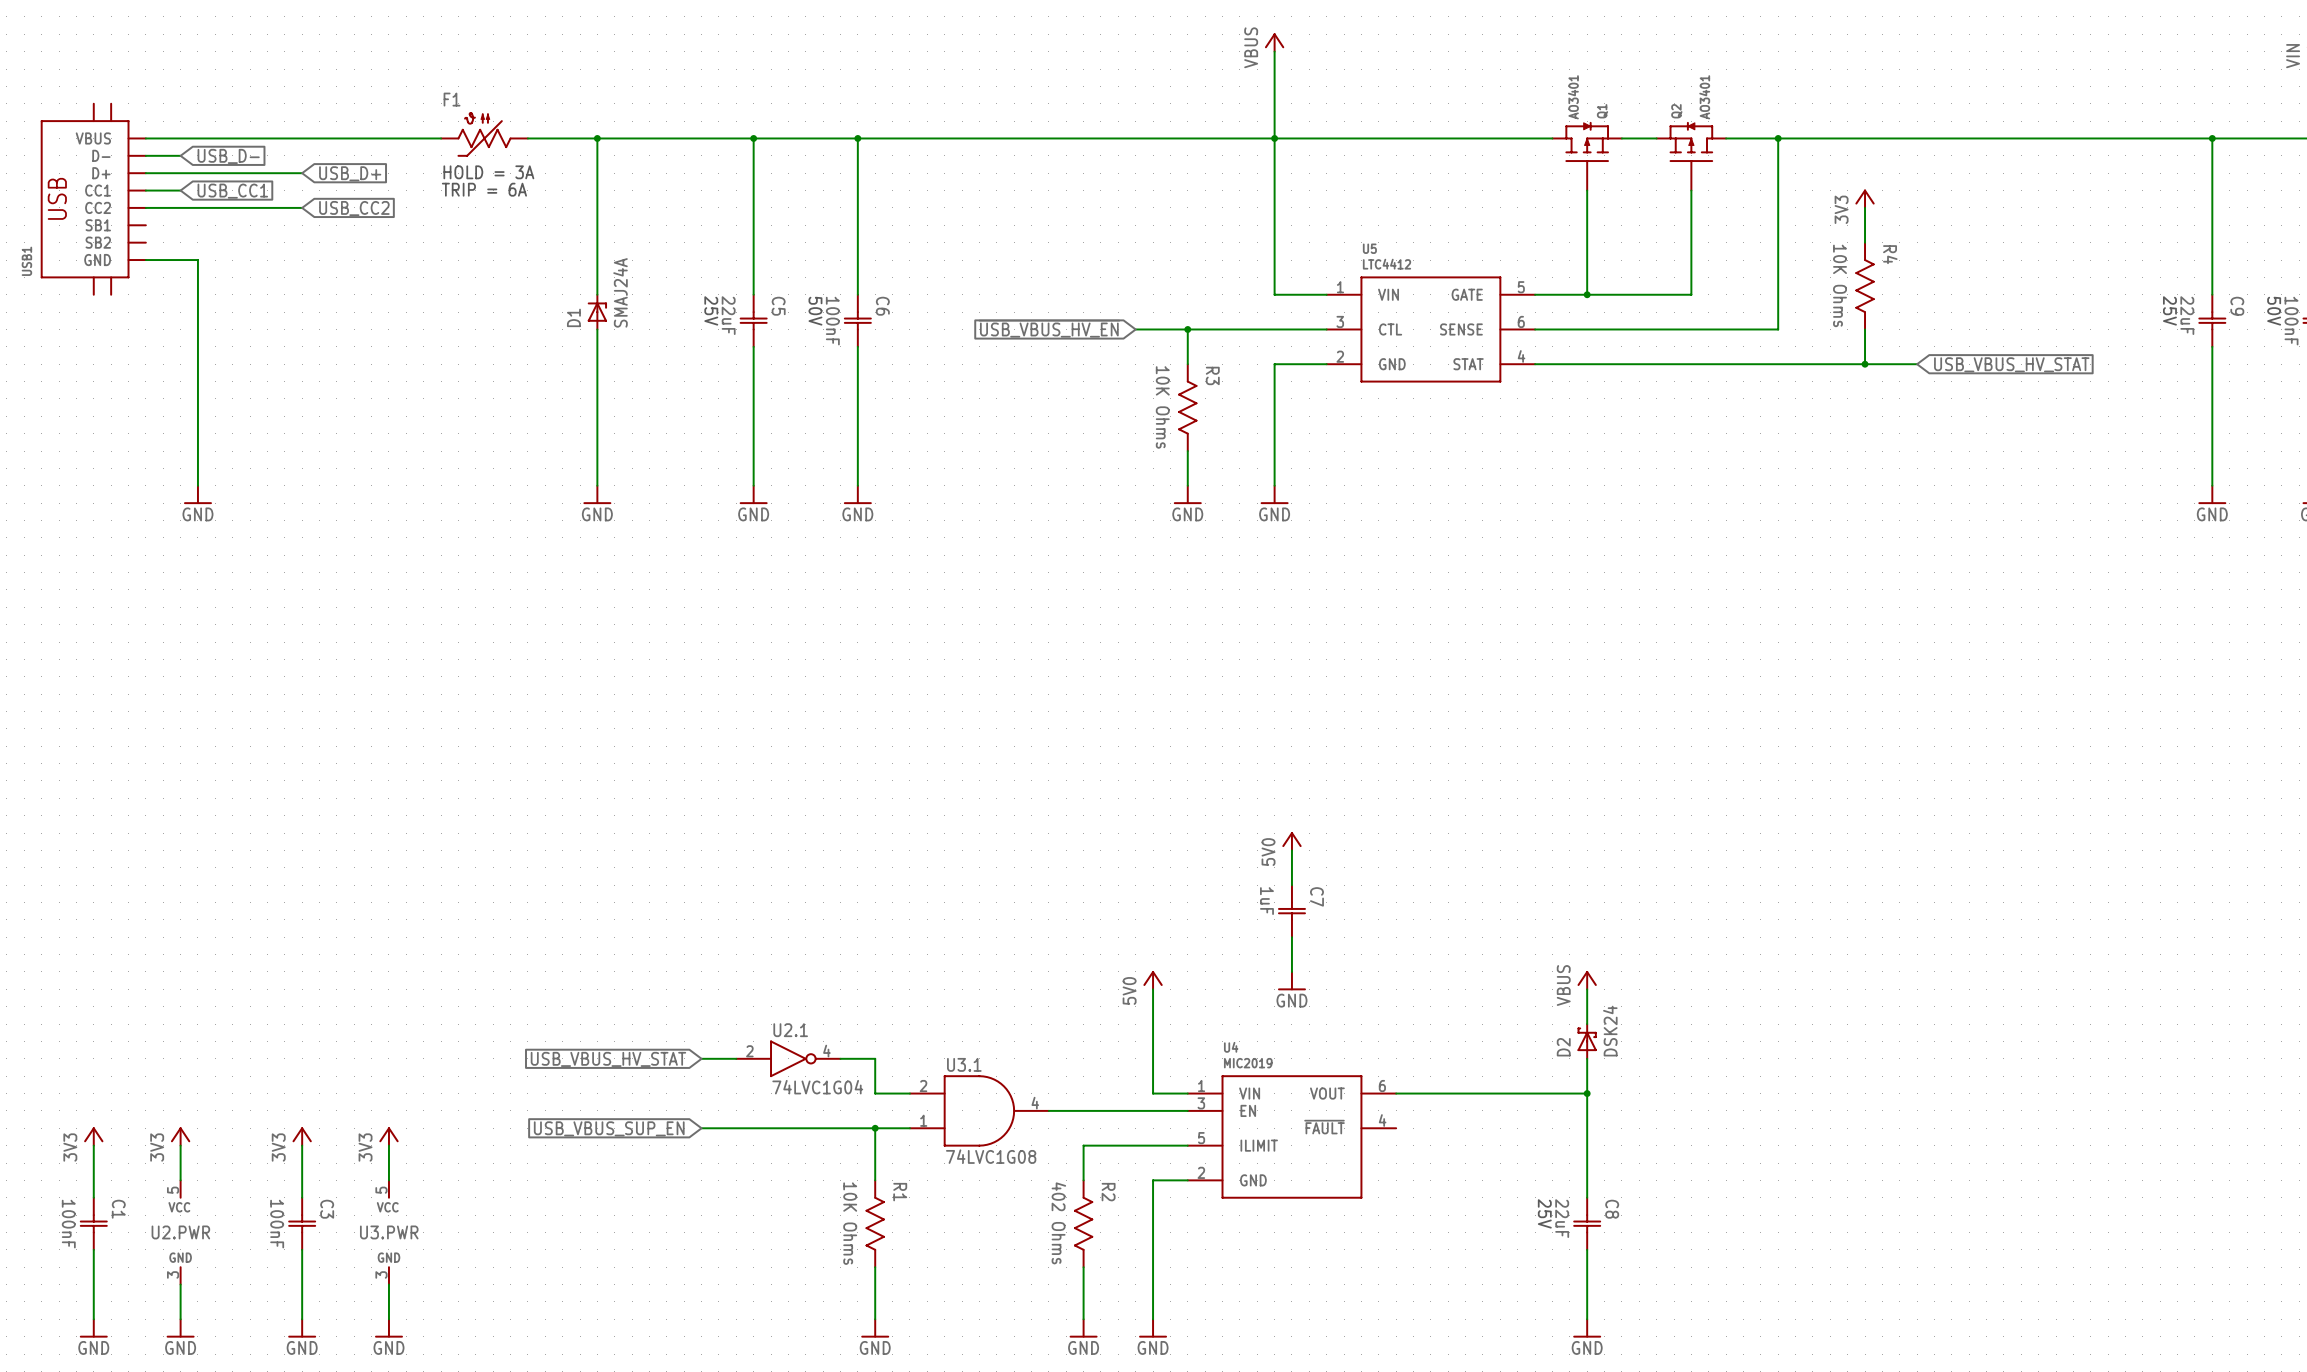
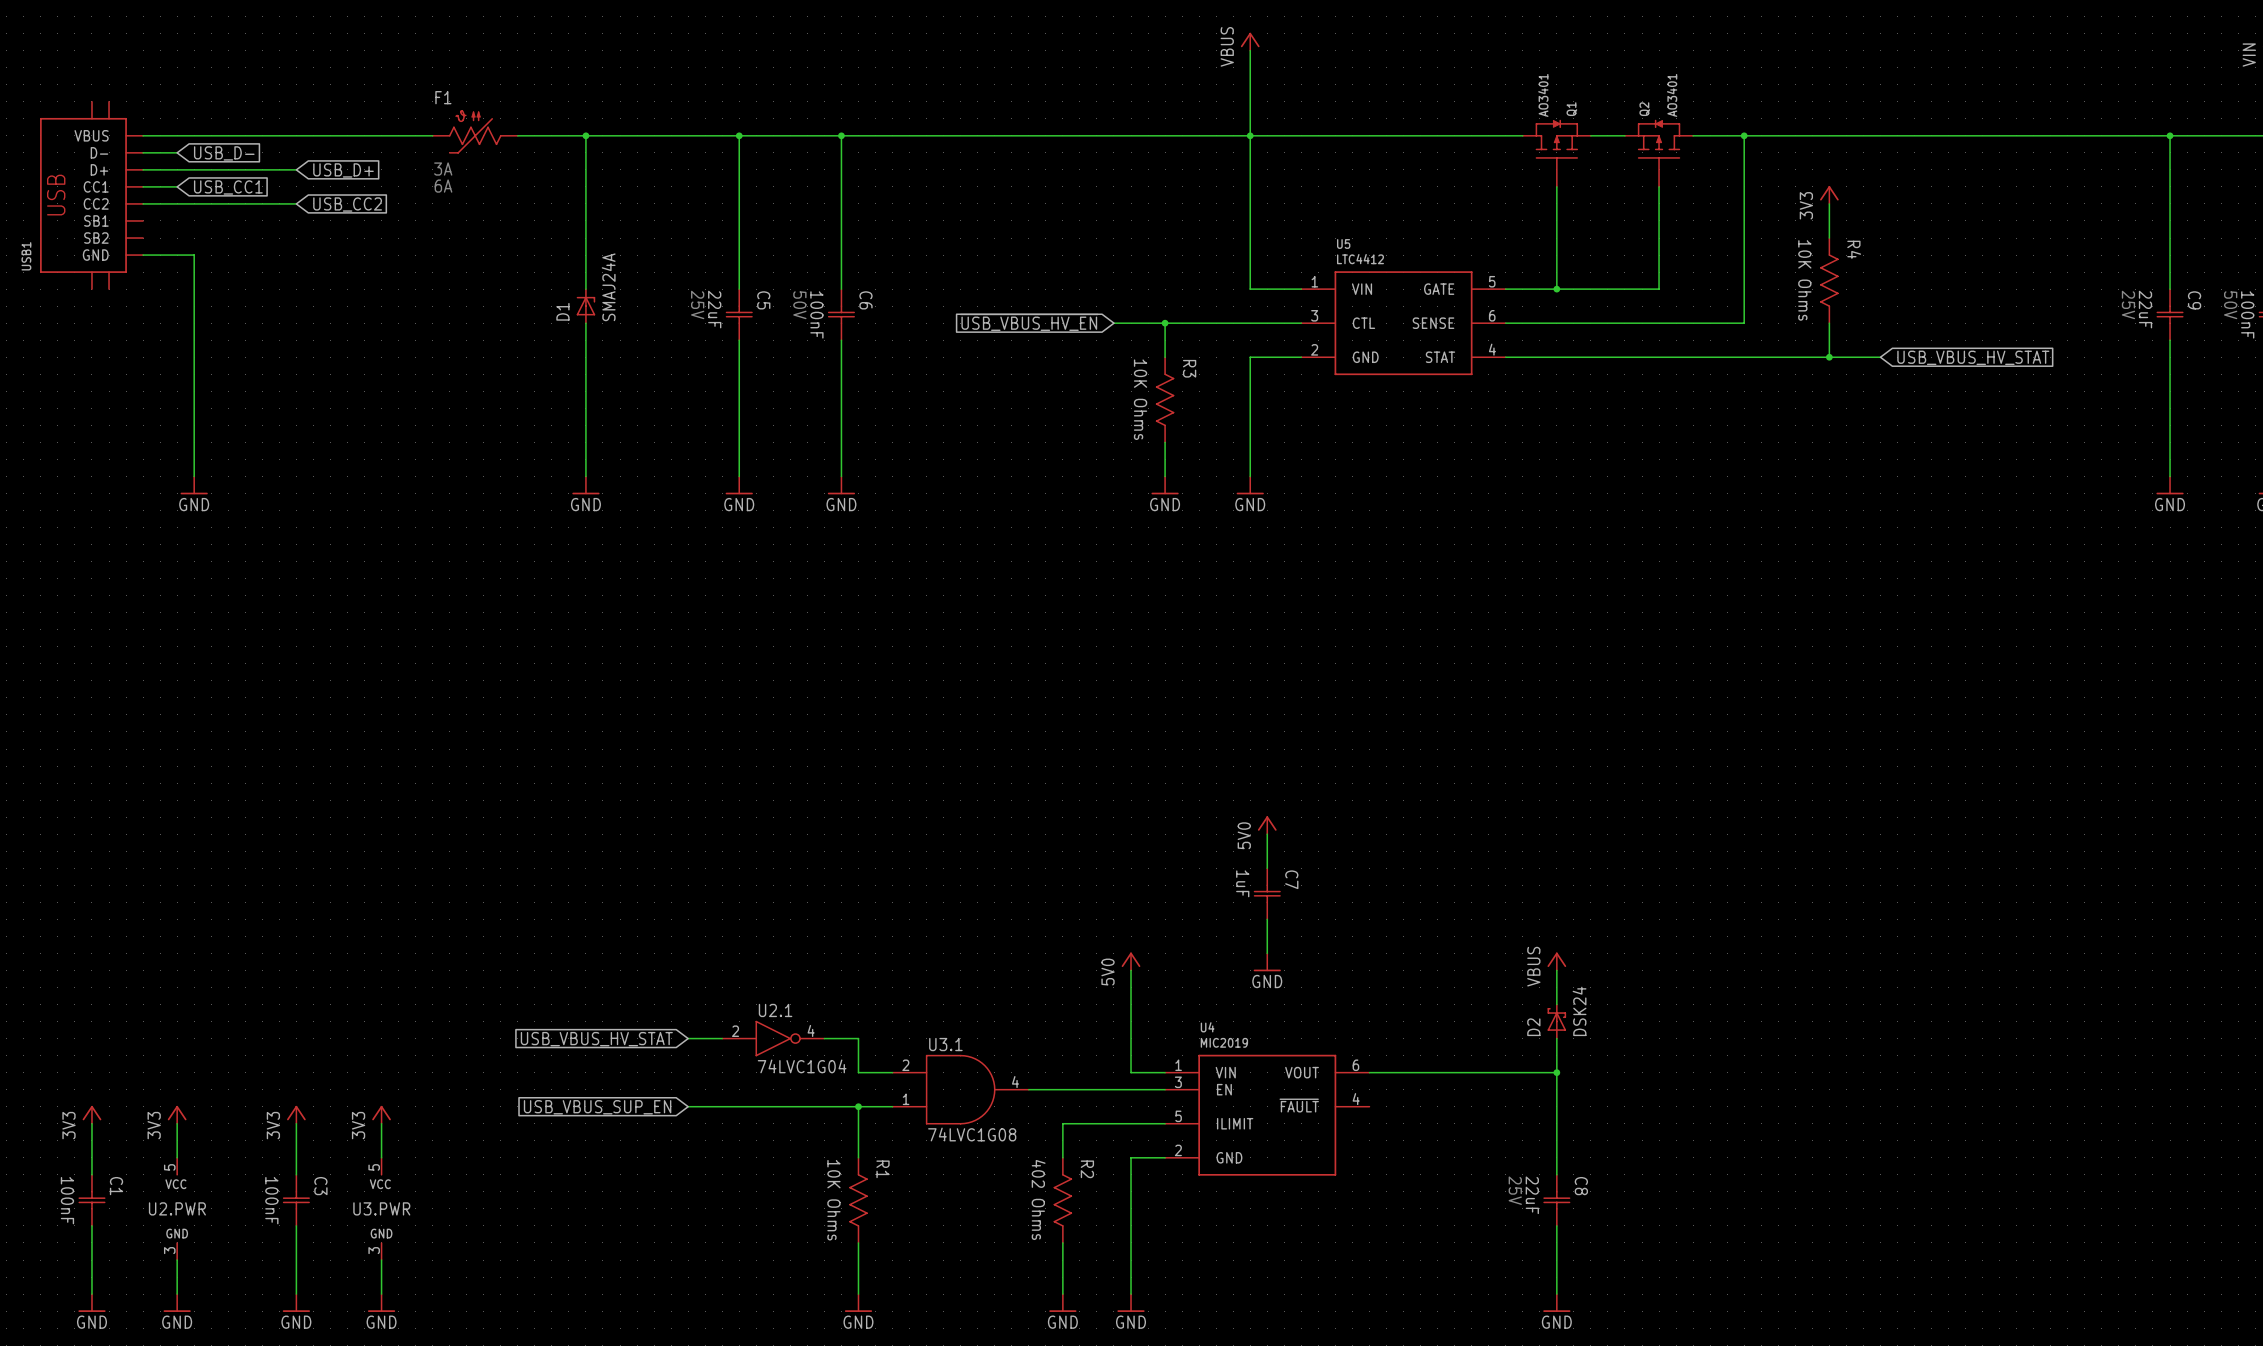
F1 text: HOLD = 3A (488, 172) -> 3A (443, 169)
F1 text: TRIP = 6A (484, 189) -> 6A (443, 186)

